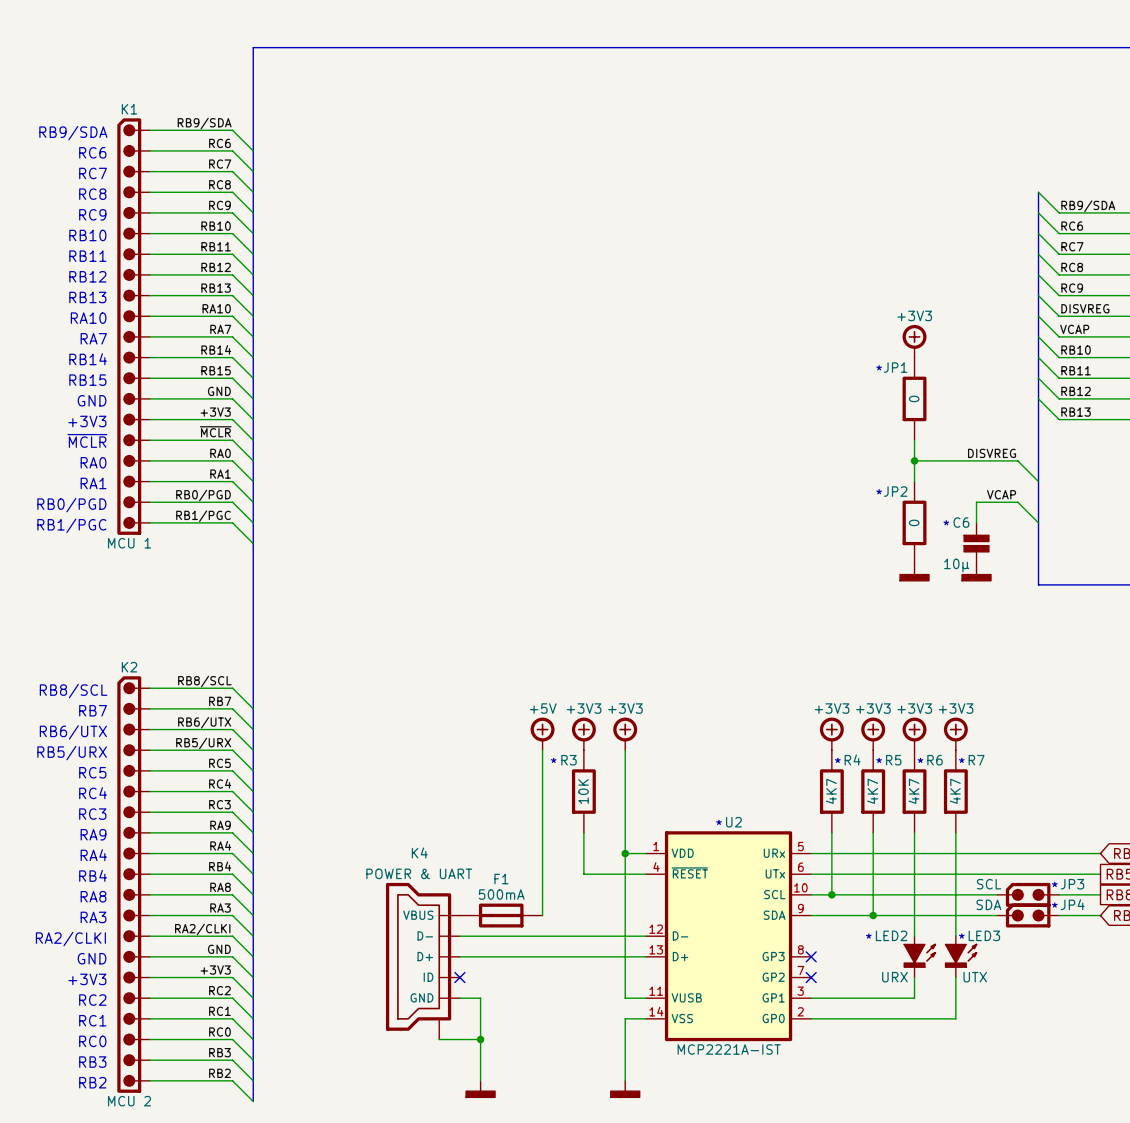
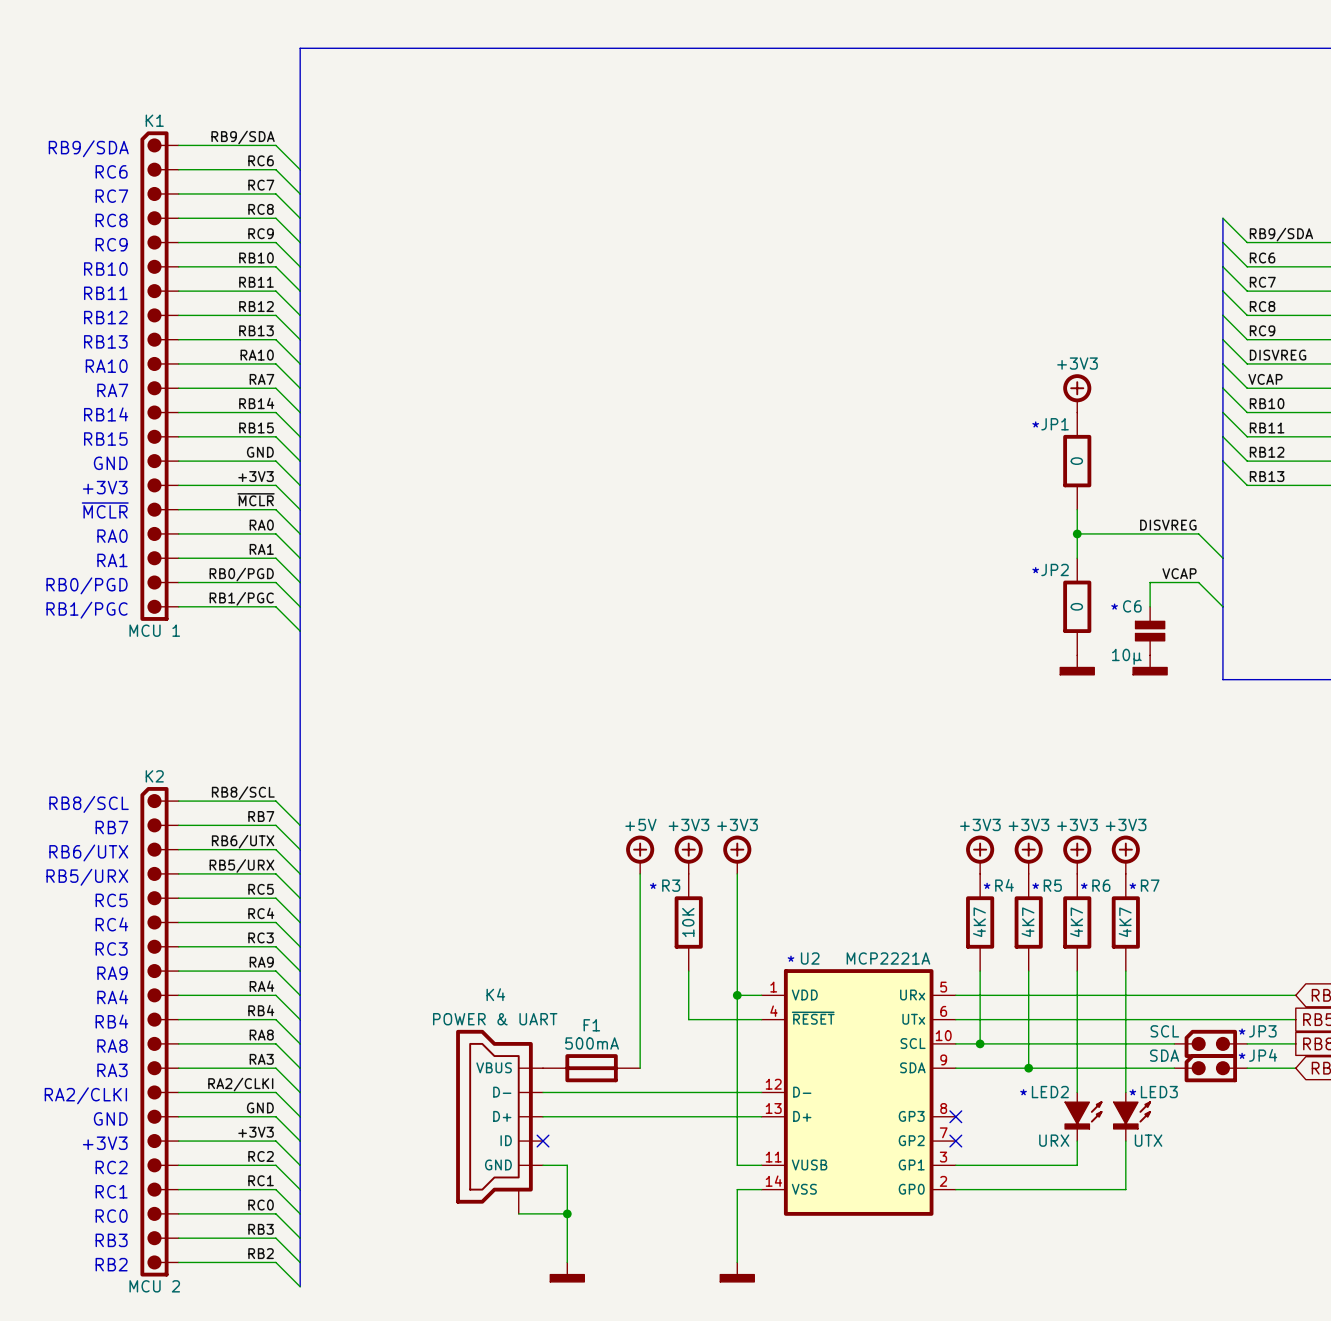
text position: * (719, 822) -> * (790, 958)
U2 name position: U2 (733, 822) -> U2 (810, 958)
U2 value: MCP2221A-IST (729, 1049) -> MCP2221A (888, 958)

